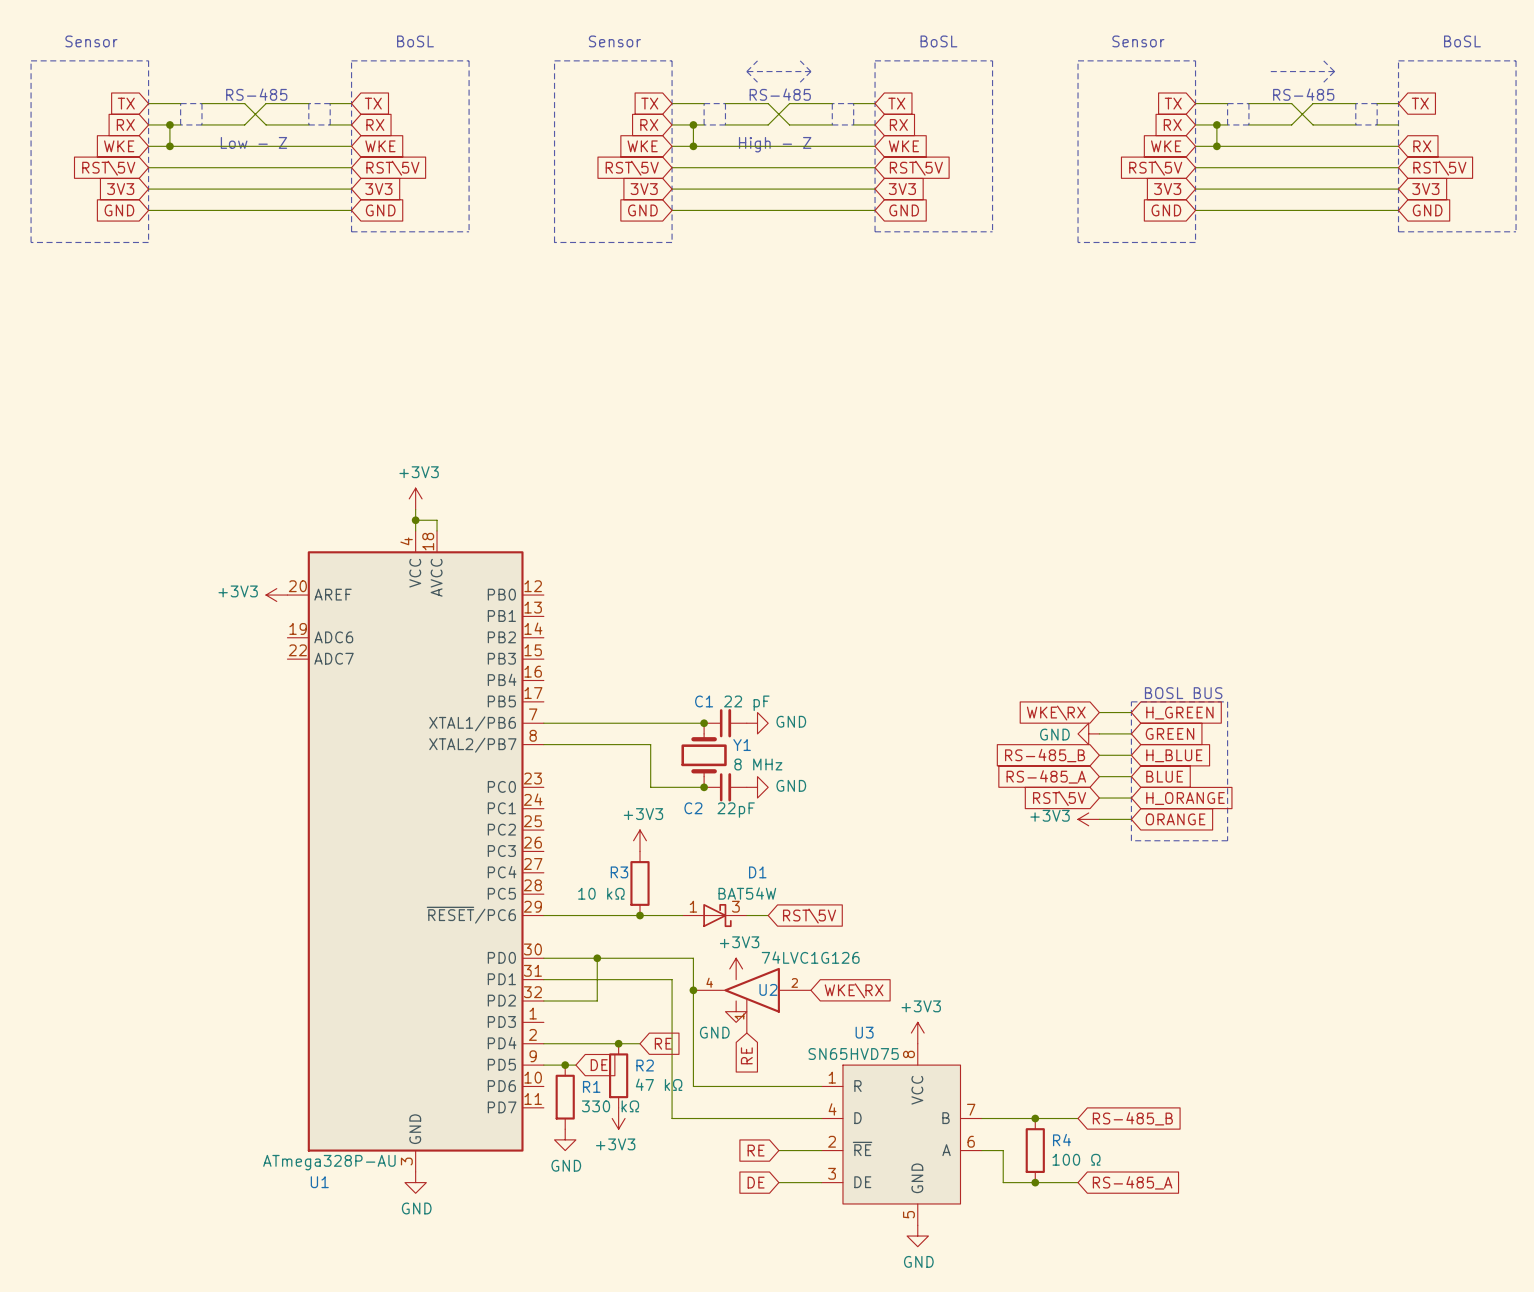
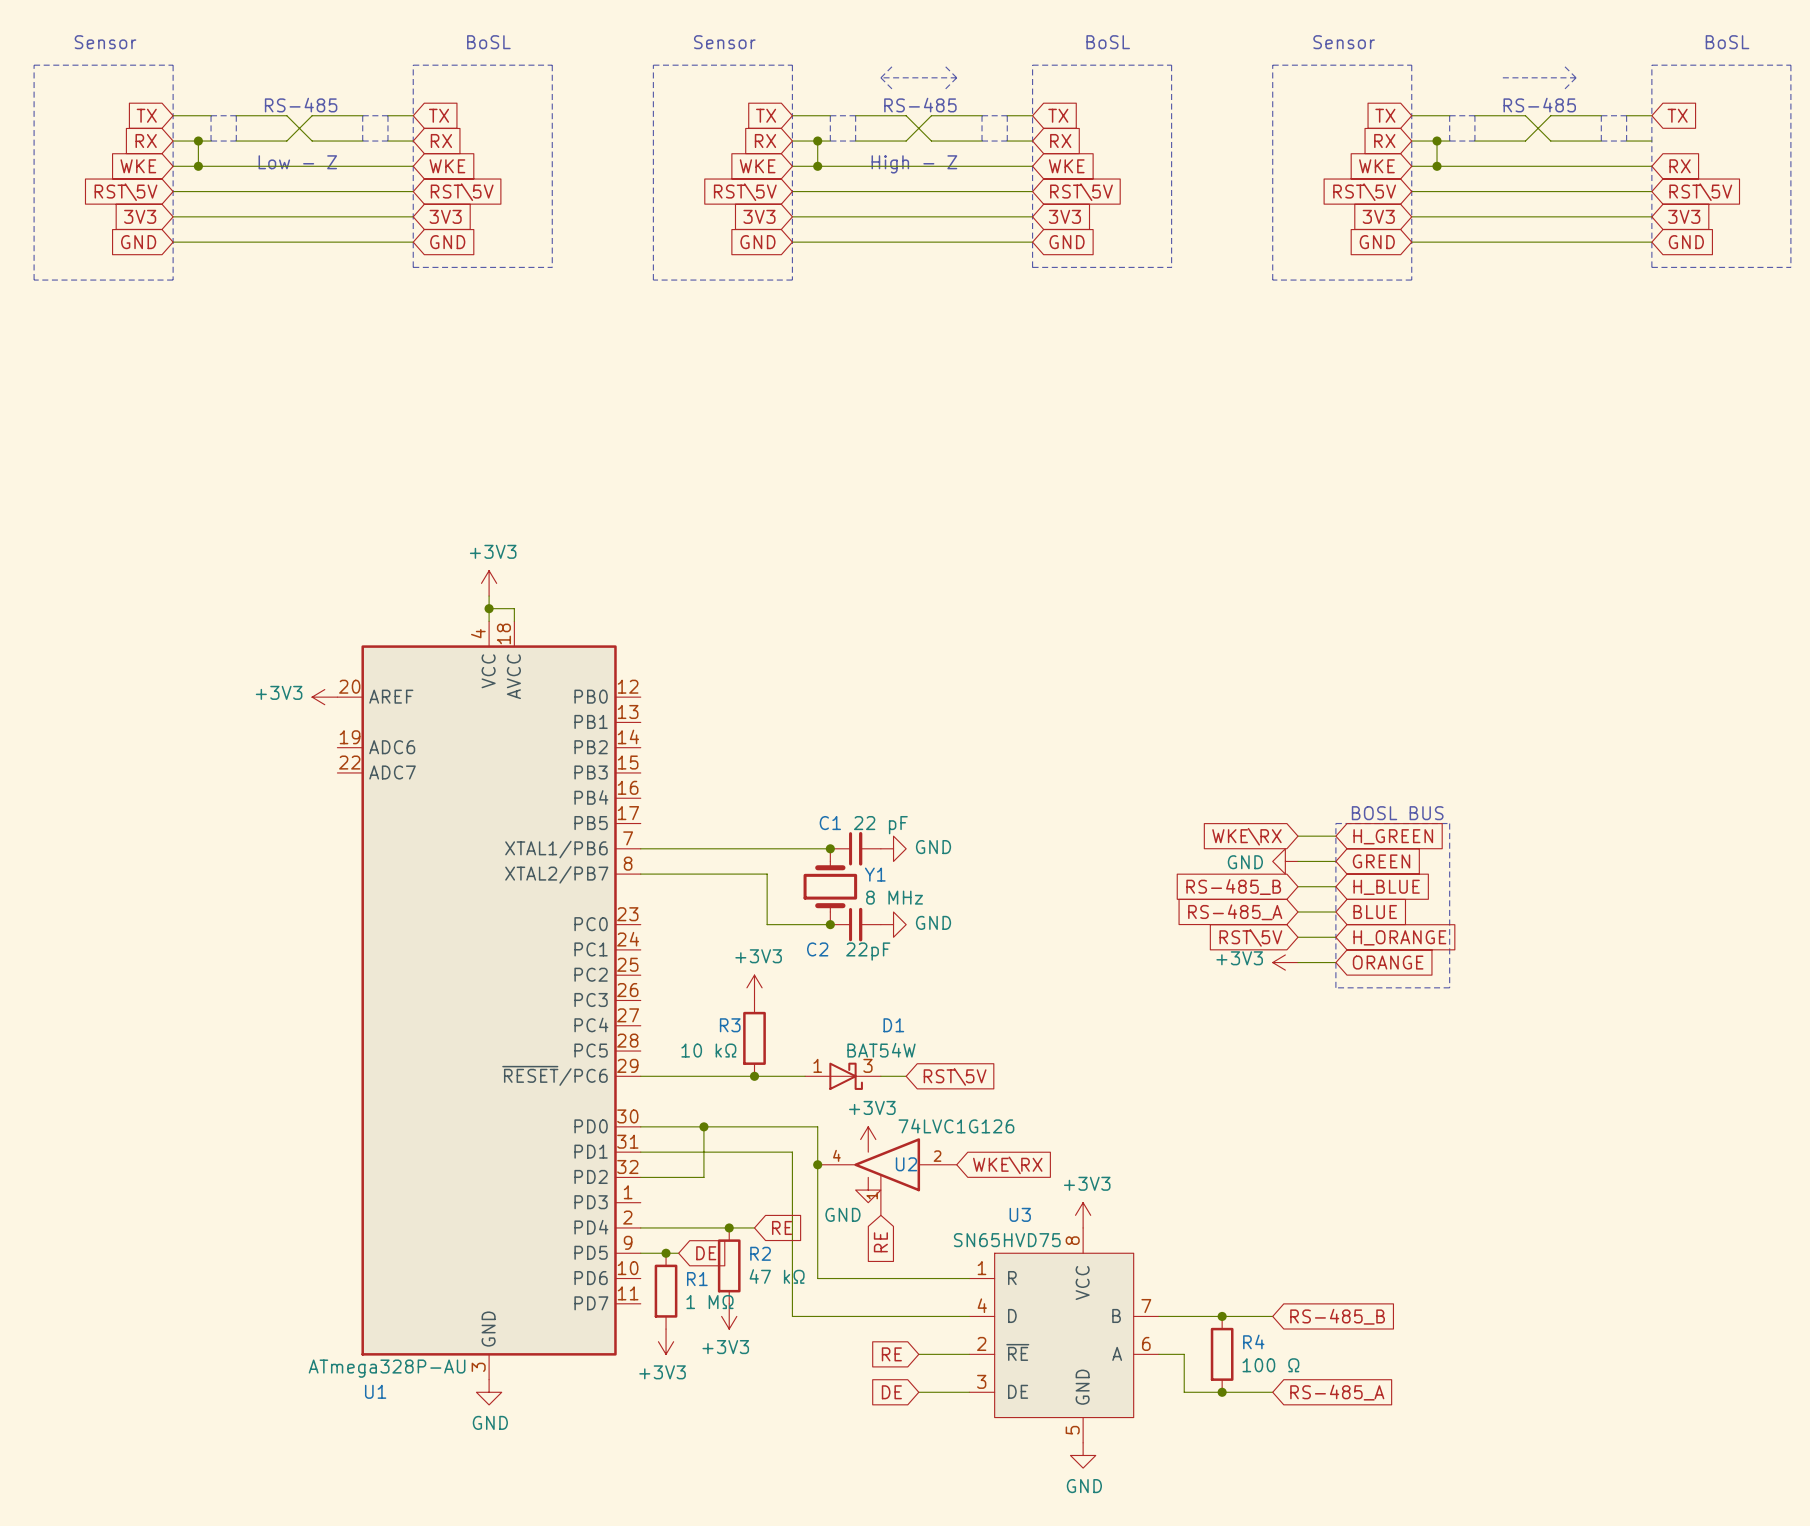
R1 value: 330 kΩ (610, 1106) -> 1 MΩ (710, 1302)
power symbol: GND (565, 1139) -> +3V3 (666, 1341)

